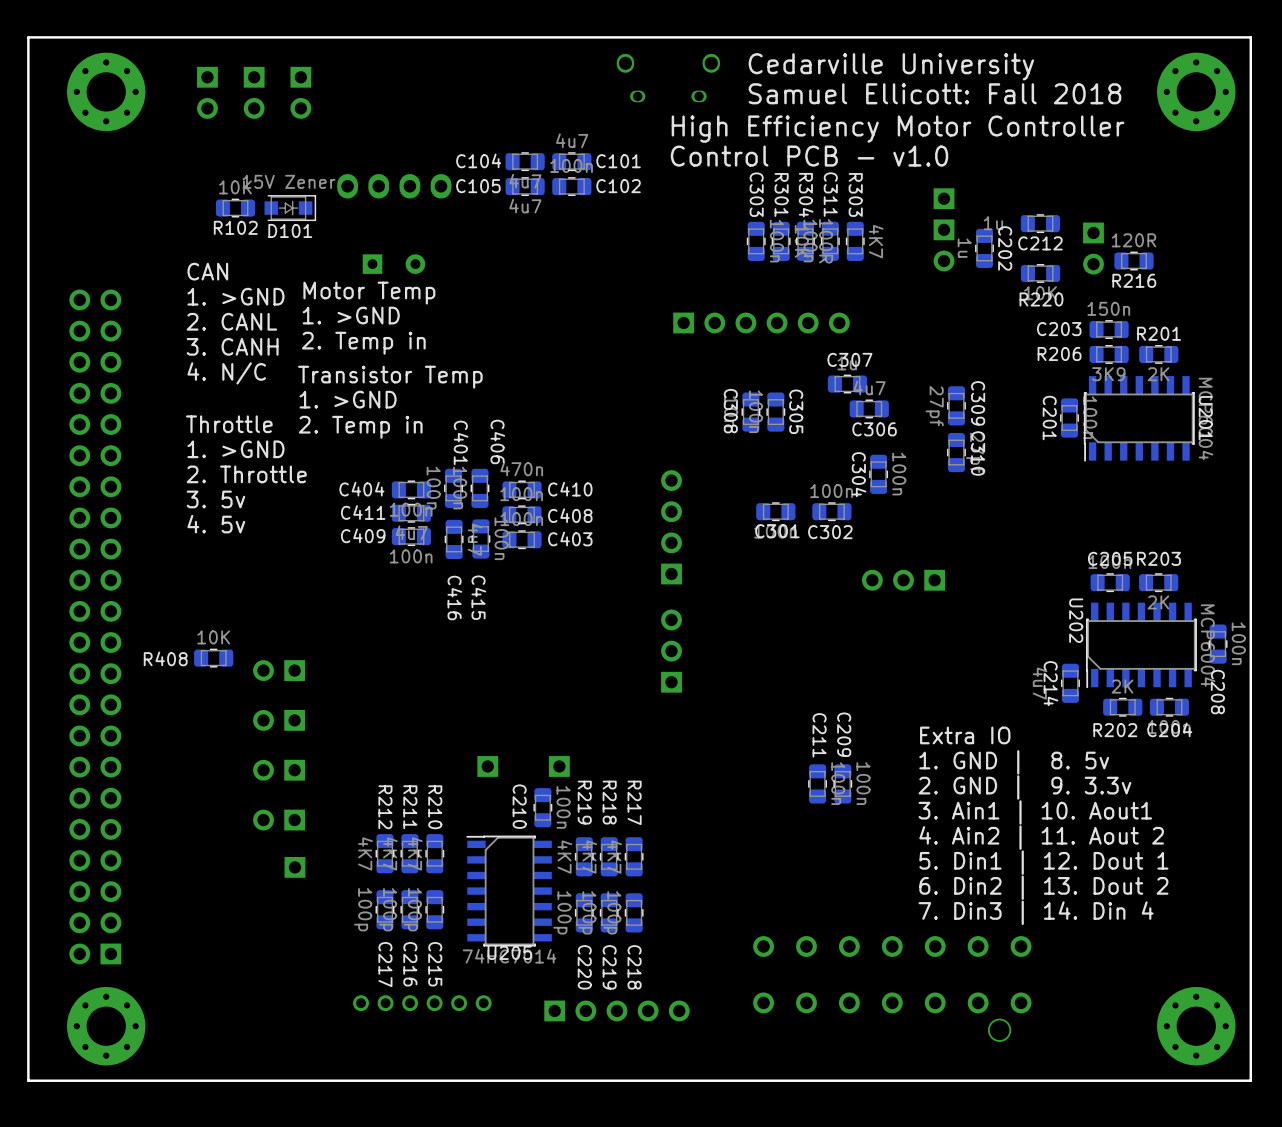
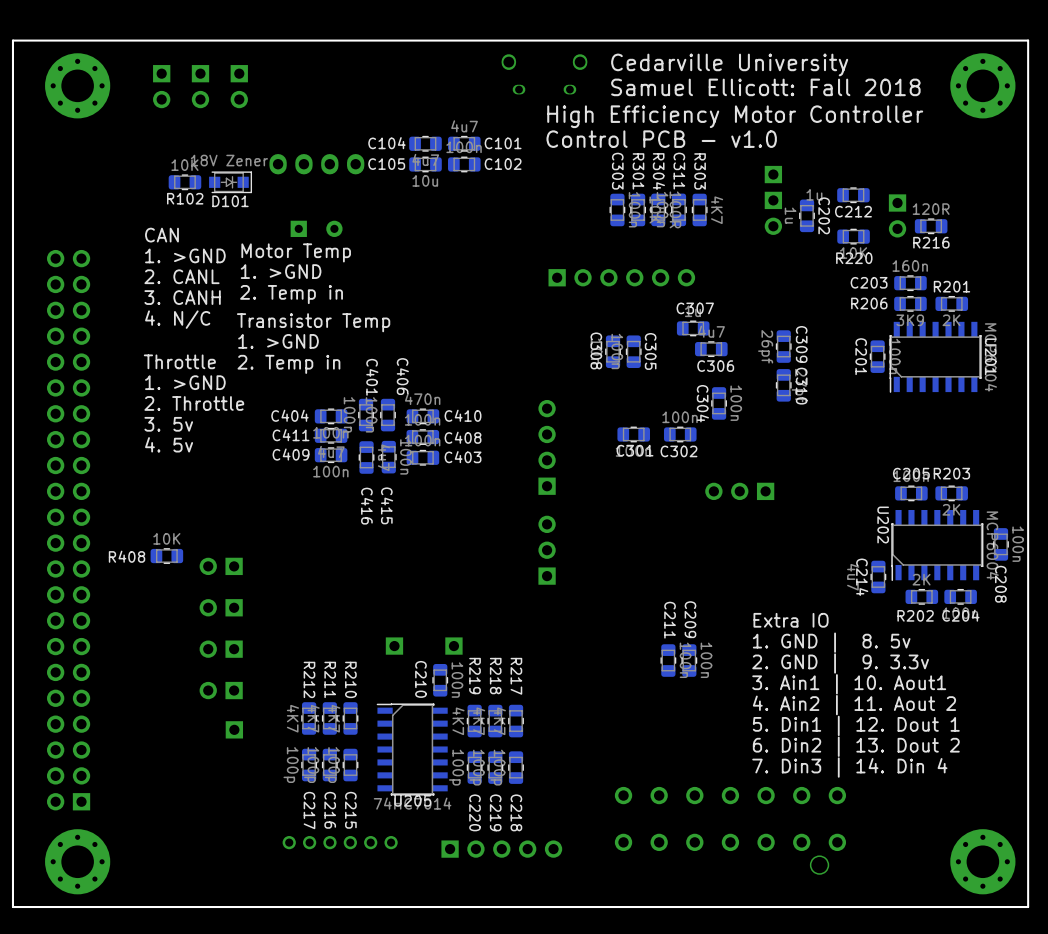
D101 value: 15V Zener (289, 181) -> 18V Zener (229, 160)
C105 value: 4u7 (525, 206) -> 10u (425, 180)
C203 value: 150n (1108, 308) -> 160n (910, 265)
C309 value: 27pf (934, 406) -> 26pf (765, 346)

